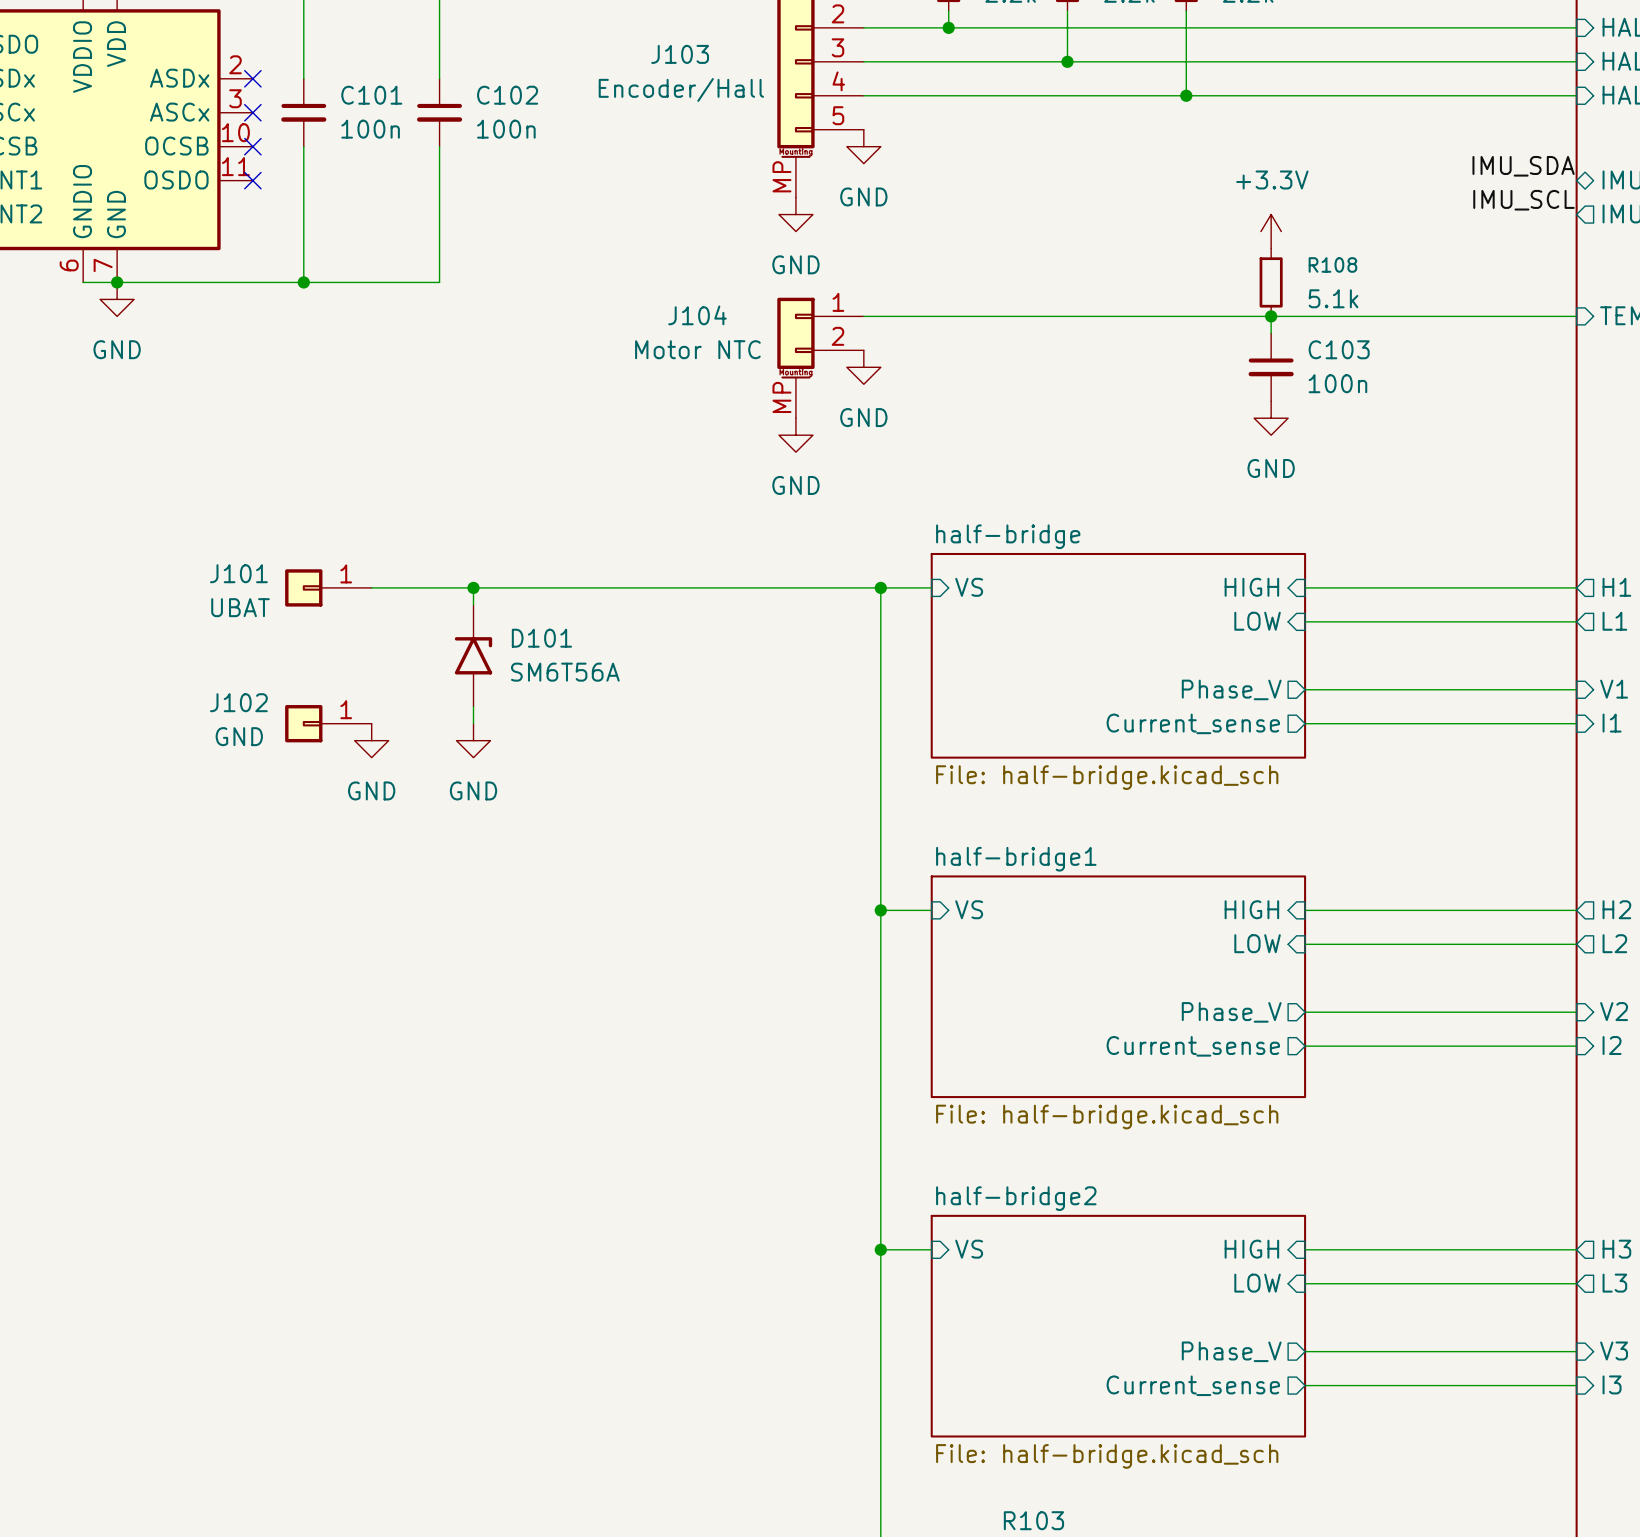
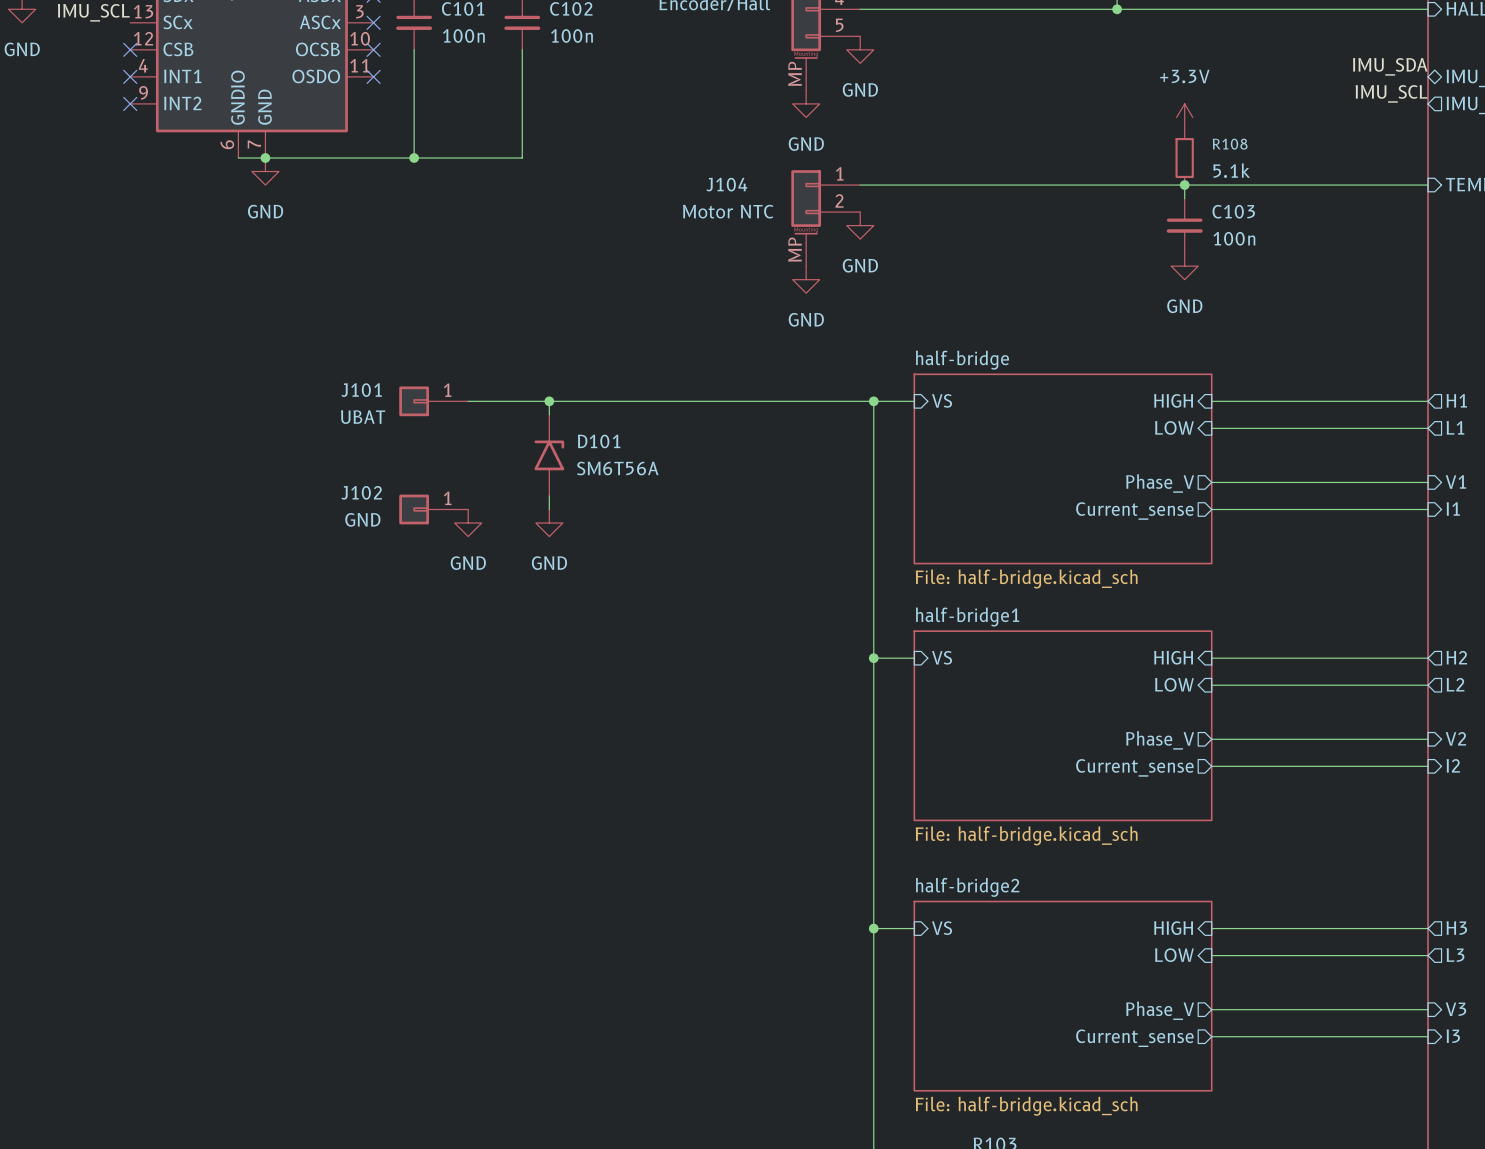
sheet half-bridge: File: half-bridge.kicad_sch (1118, 655) -> none
sheet half-bridge: none -> File: half-bridge.kicad_sch (1063, 468)
sheet half-bridge1 shape: [930, 875, 1307, 1099] -> [913, 630, 1213, 822]
sheet half-bridge2 shape: [930, 1214, 1307, 1438] -> [913, 900, 1213, 1092]

